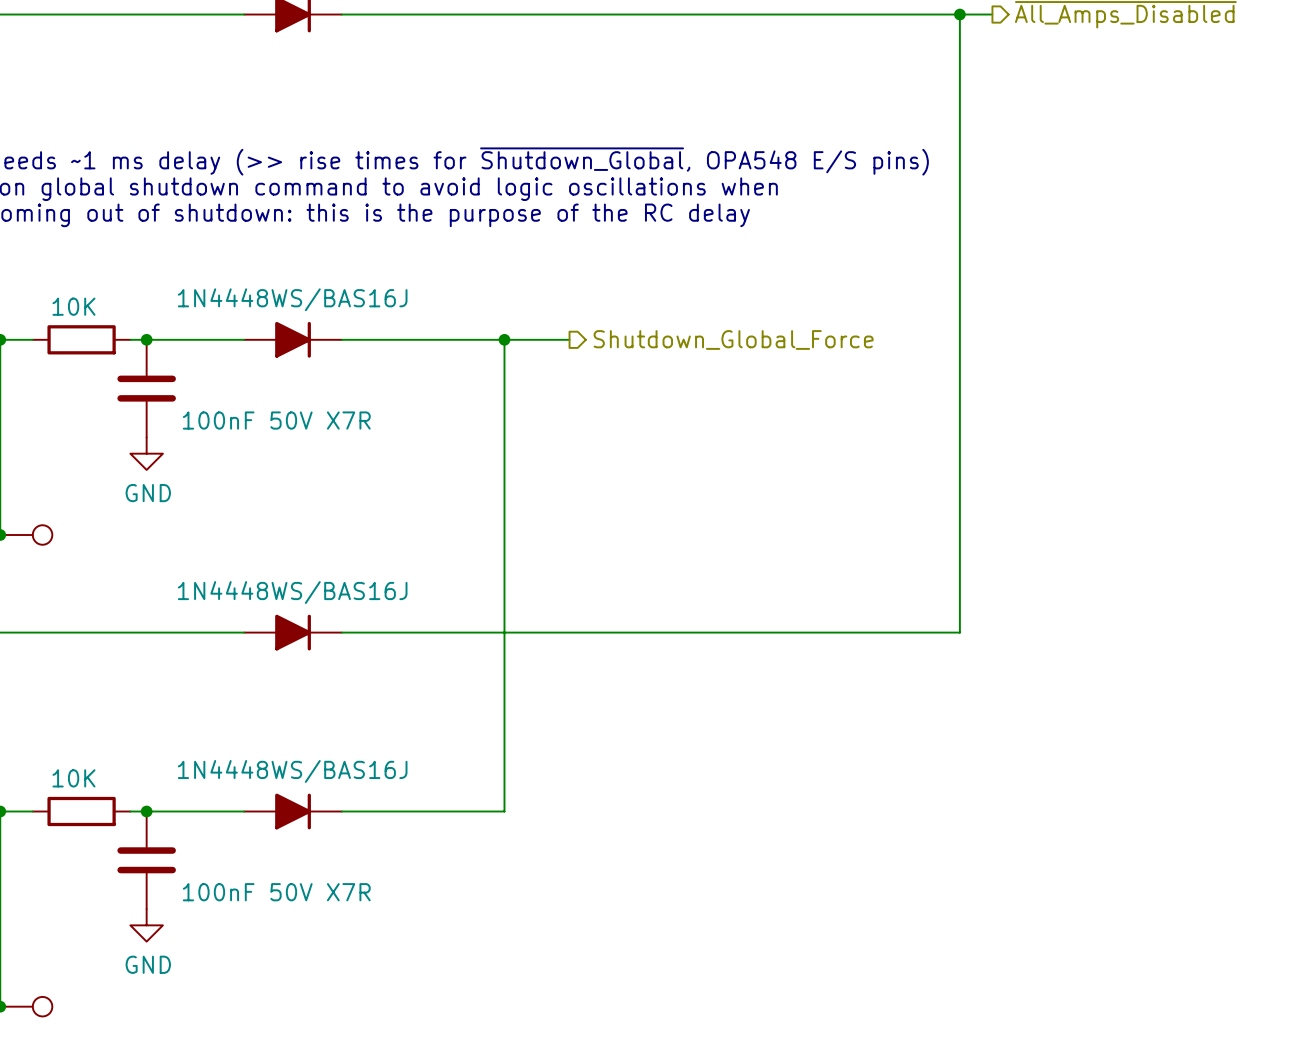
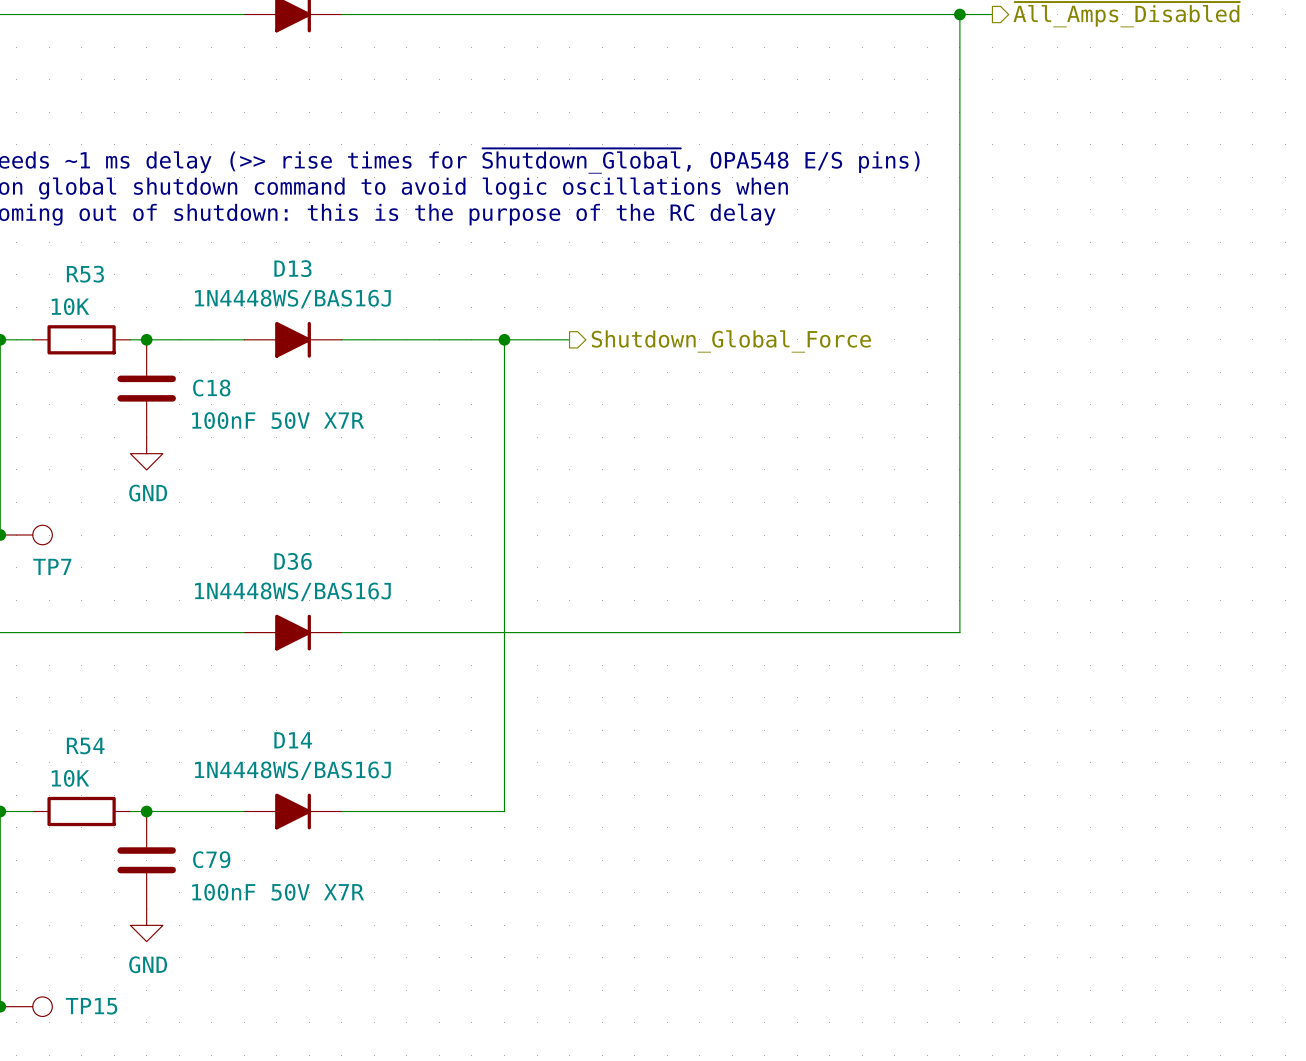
D13 name: none -> D13 (292, 268)
R53 name: none -> R53 (85, 274)
C18 name: none -> C18 (211, 388)
D36 name: none -> D36 (293, 561)
TP7 name: none -> TP7 (52, 566)
D14 name: none -> D14 (293, 740)
R54 name: none -> R54 (85, 745)
C79 name: none -> C79 (211, 859)
TP15 name: none -> TP15 (91, 1006)

